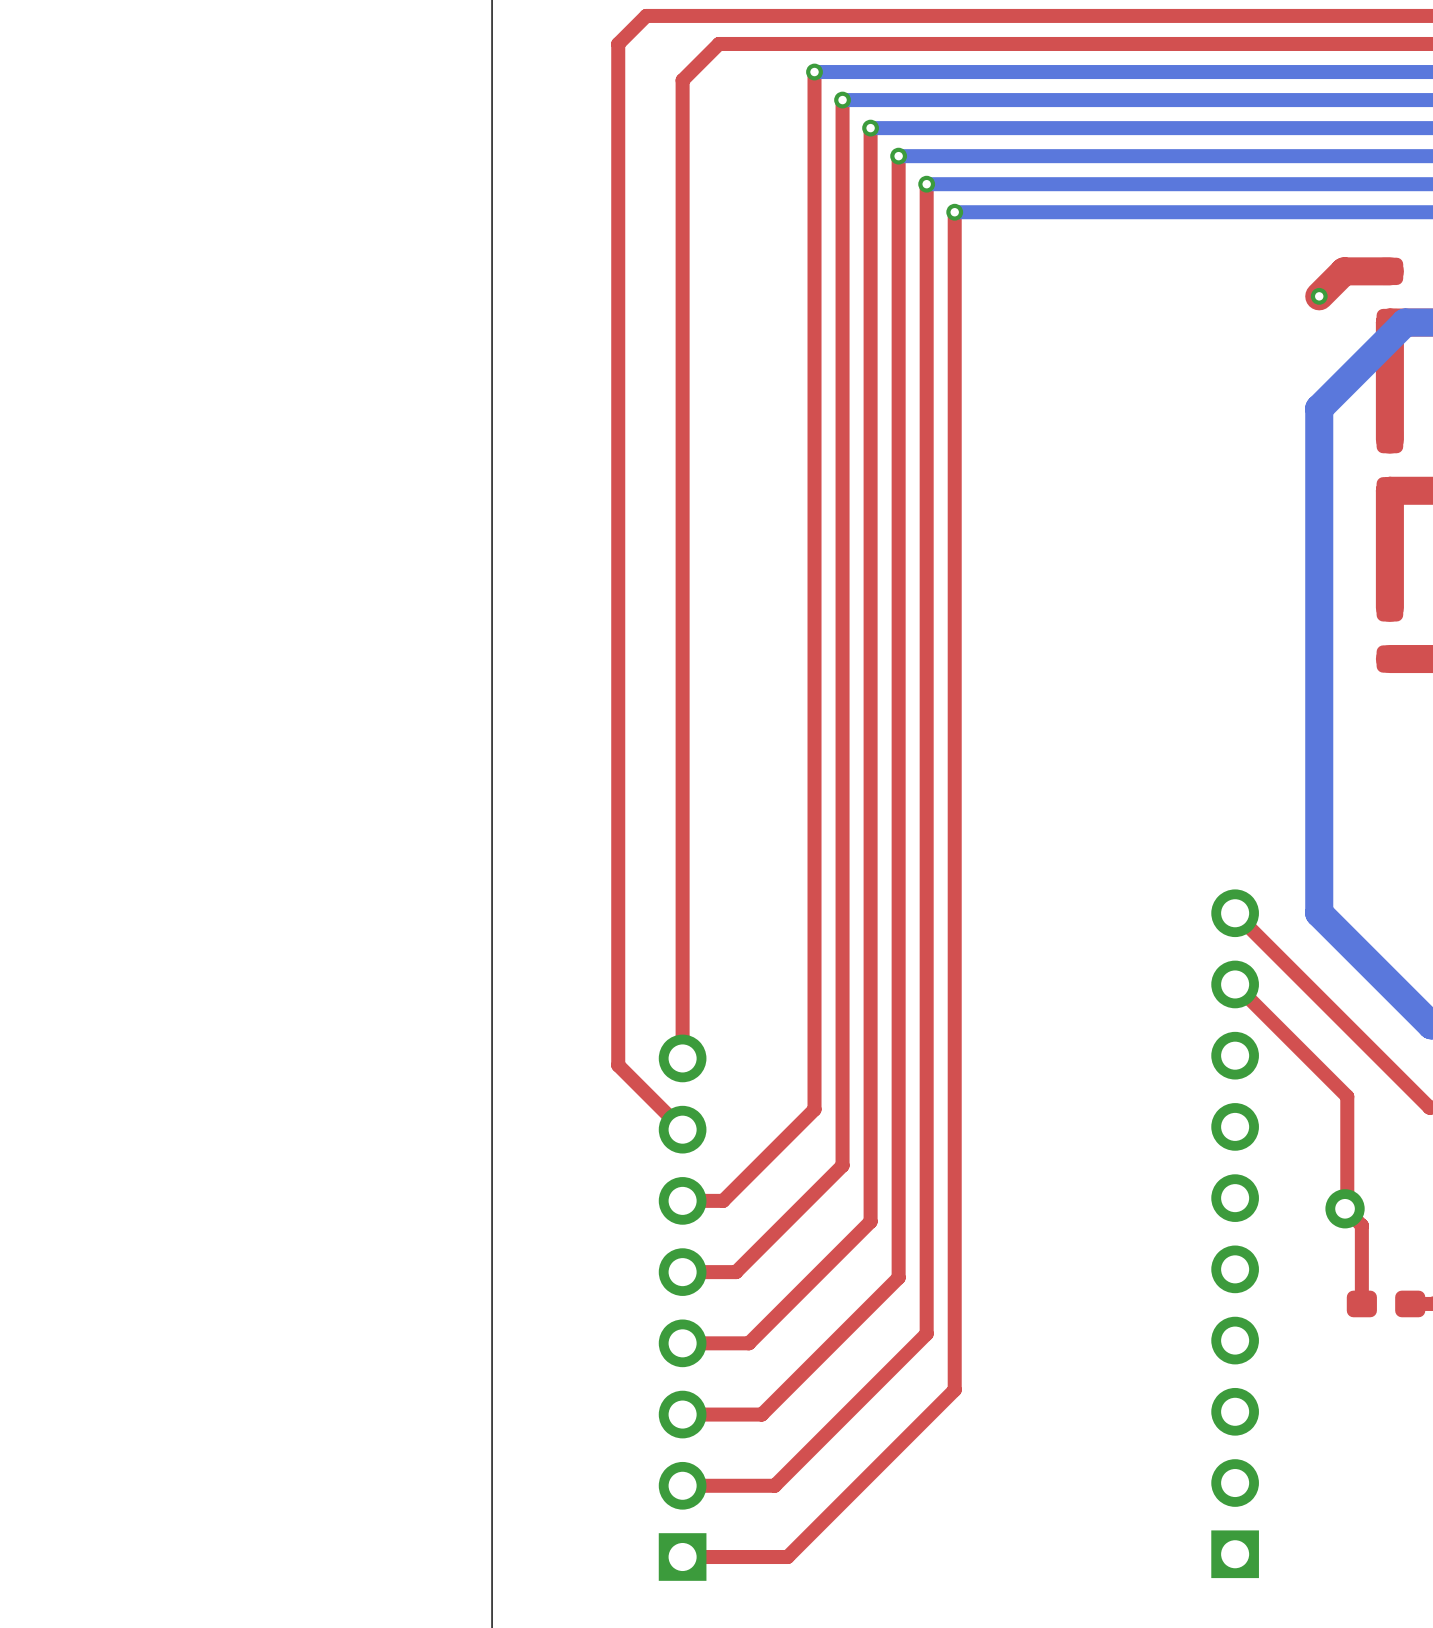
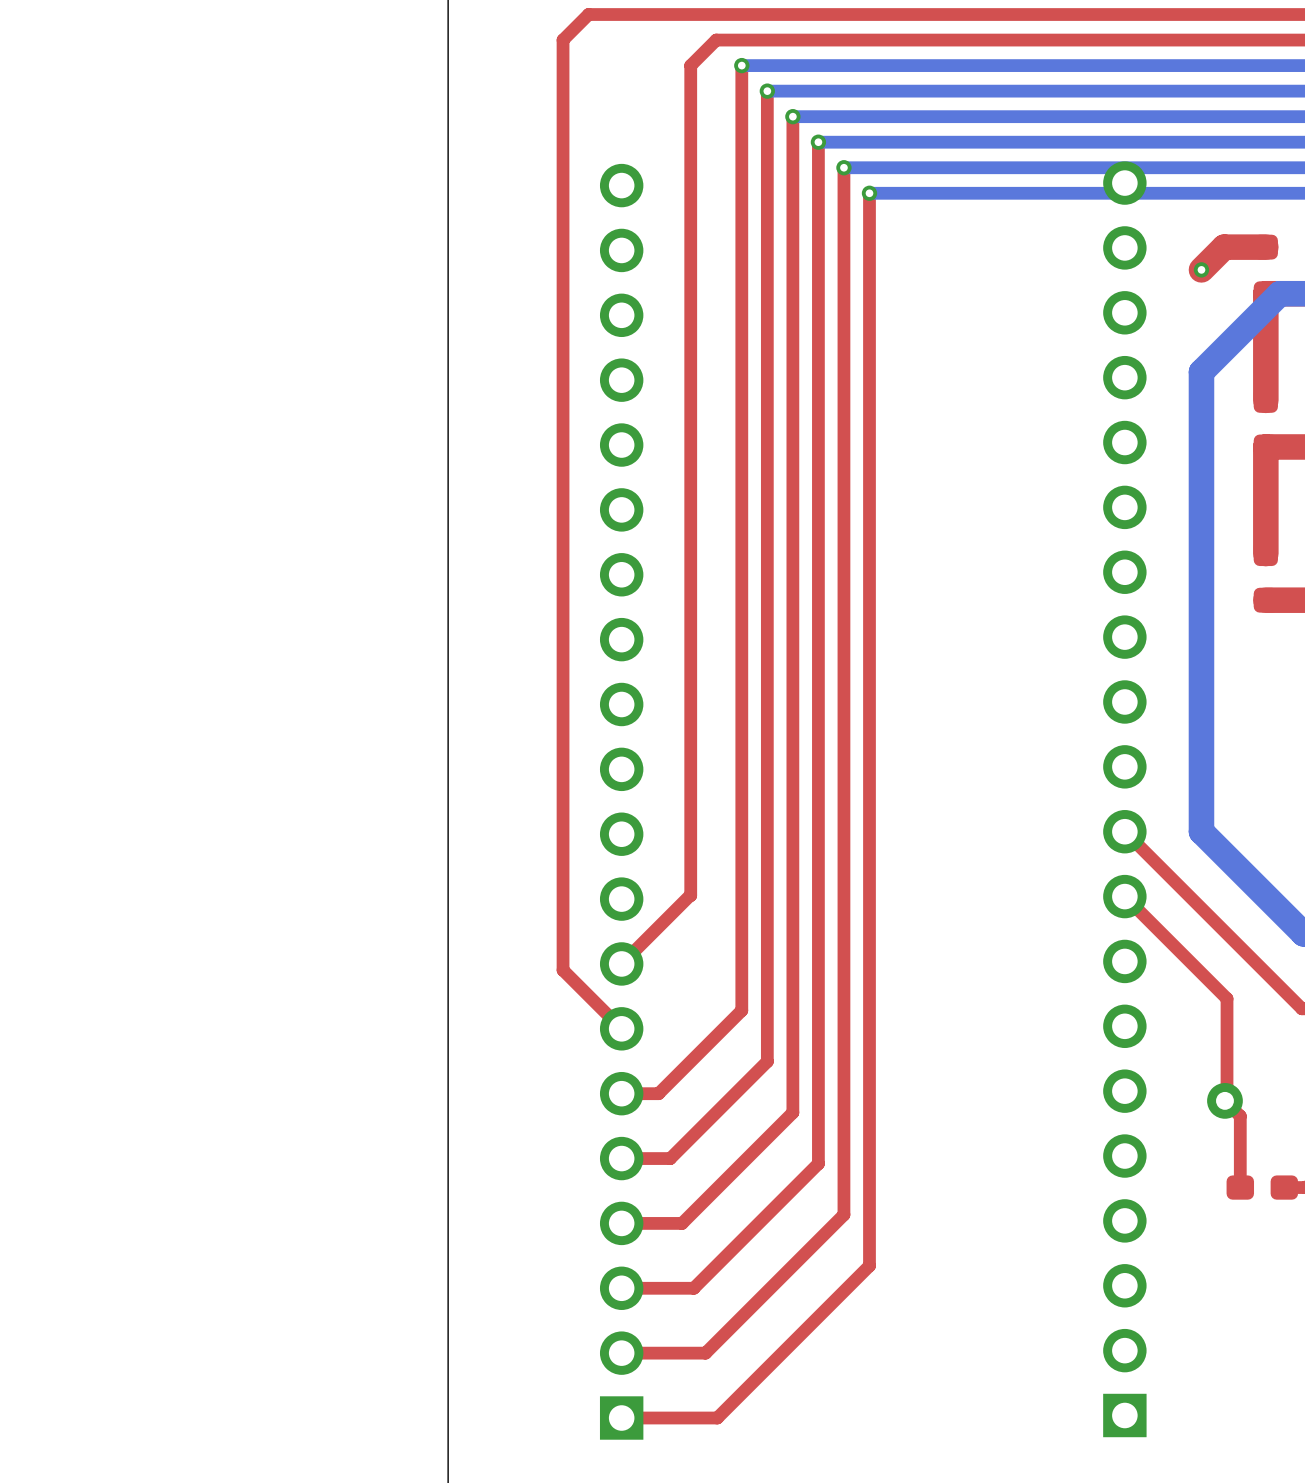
top track: (786, 43) (718, 43) (682, 80) (682, 1058) -> (716, 40) (690, 65) (690, 895) (621, 963)
part: none -> (1124, 799)
part: none -> (621, 801)
part: (682, 1307) -> none

